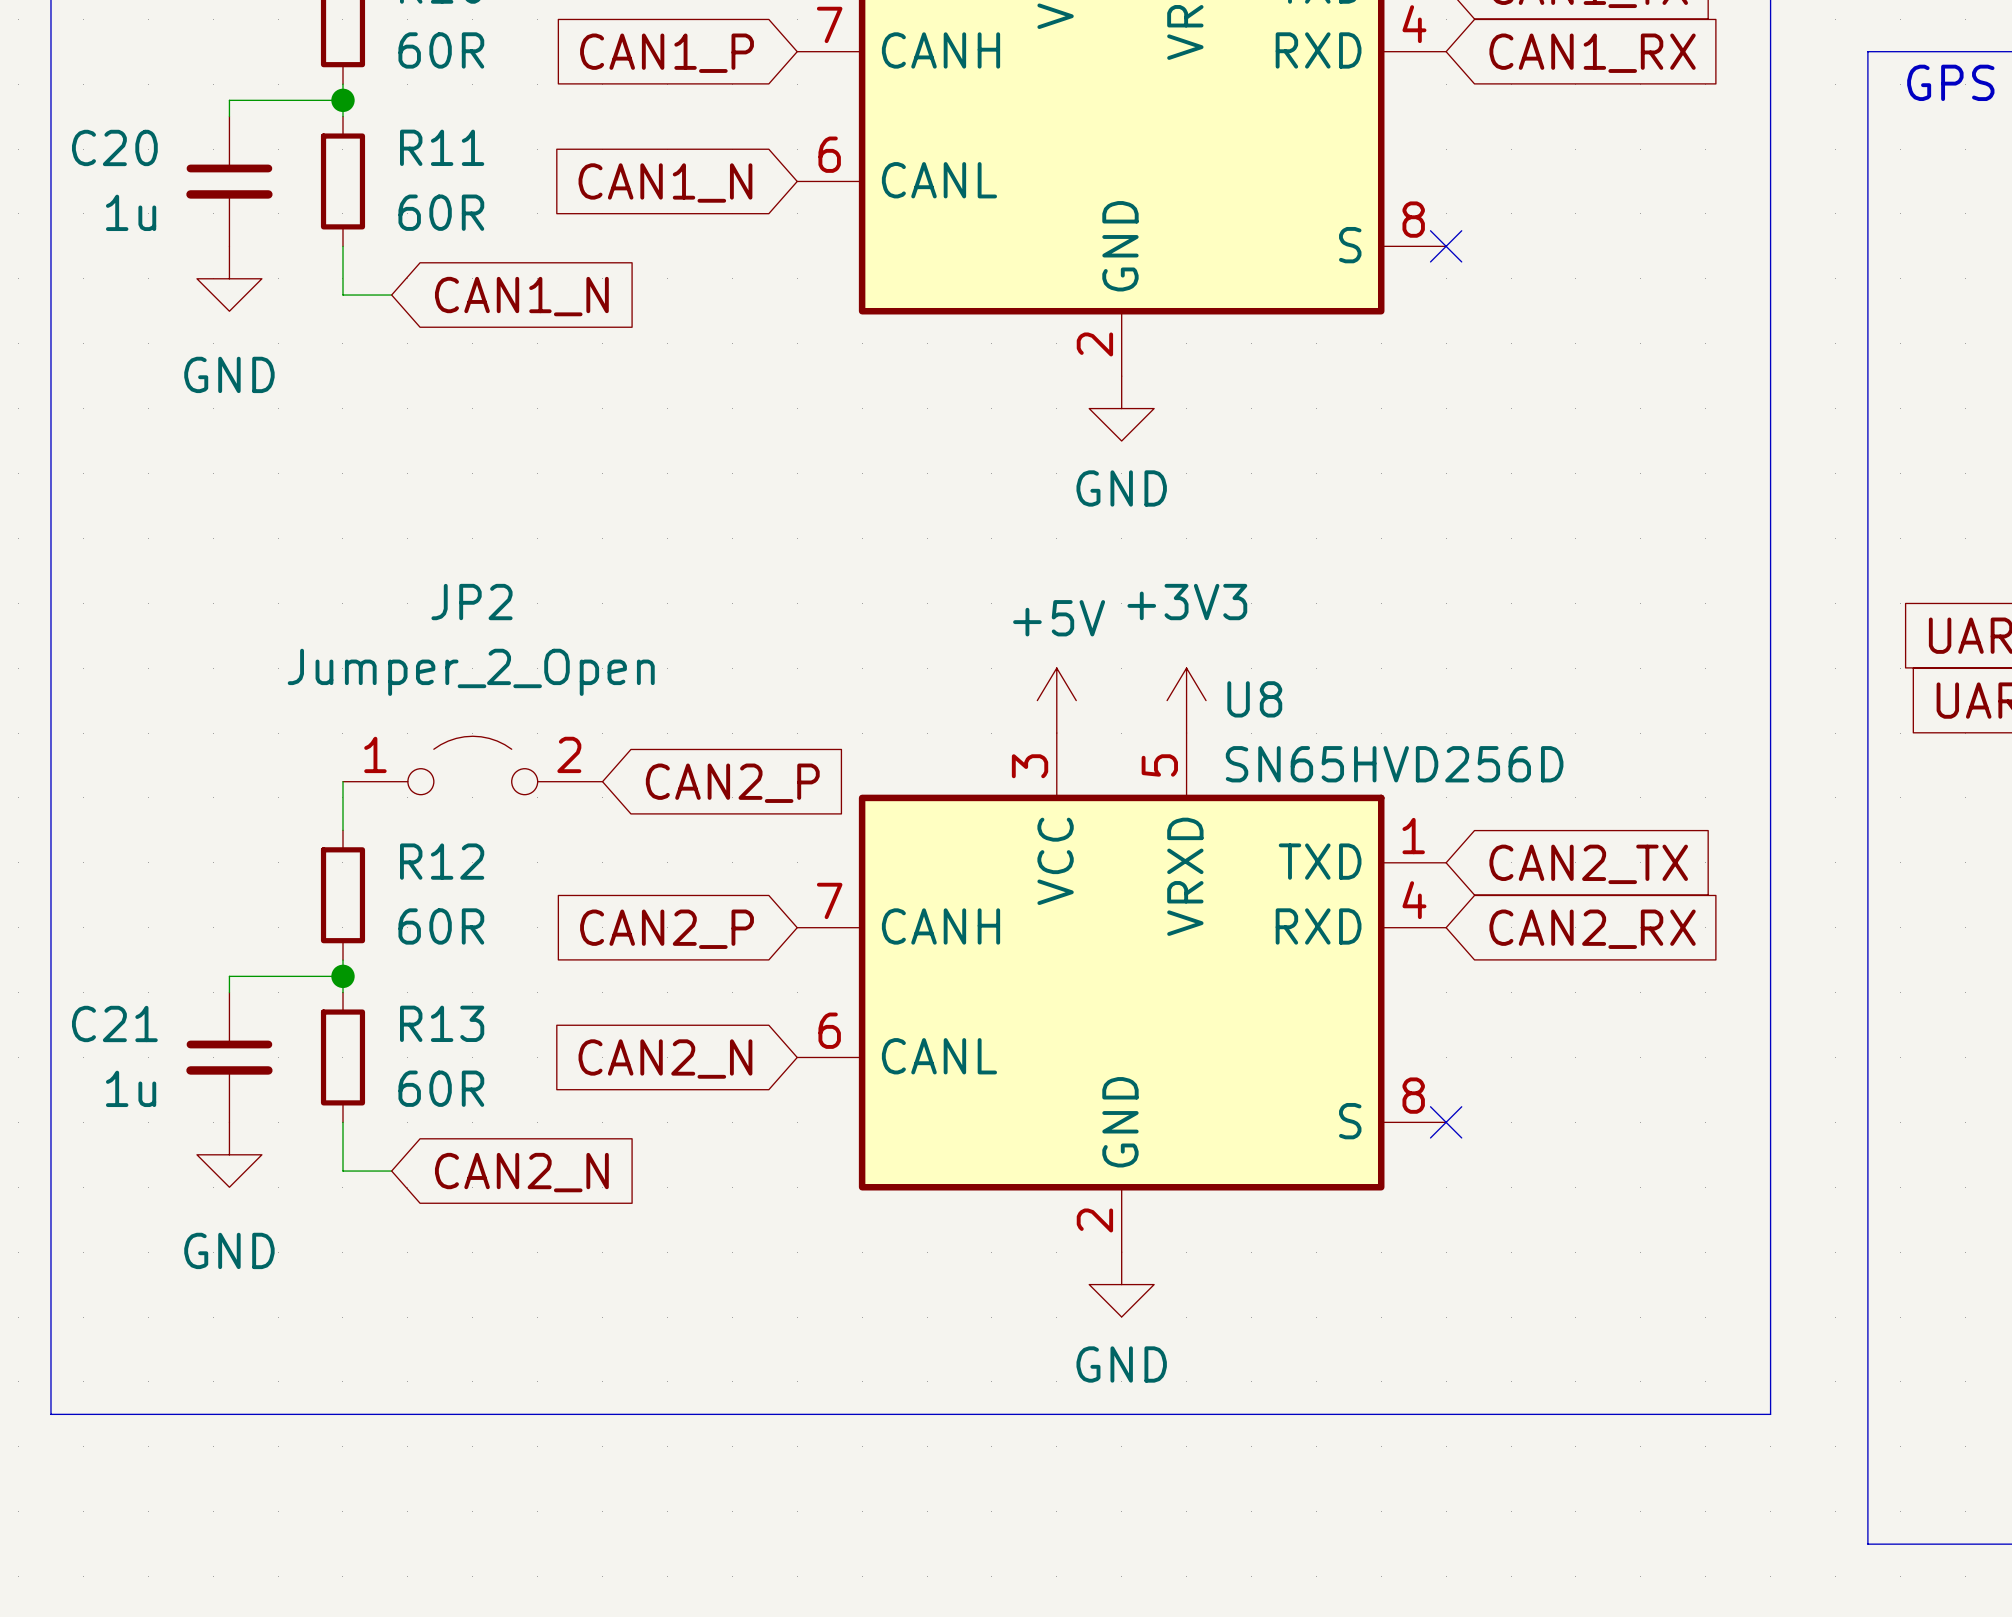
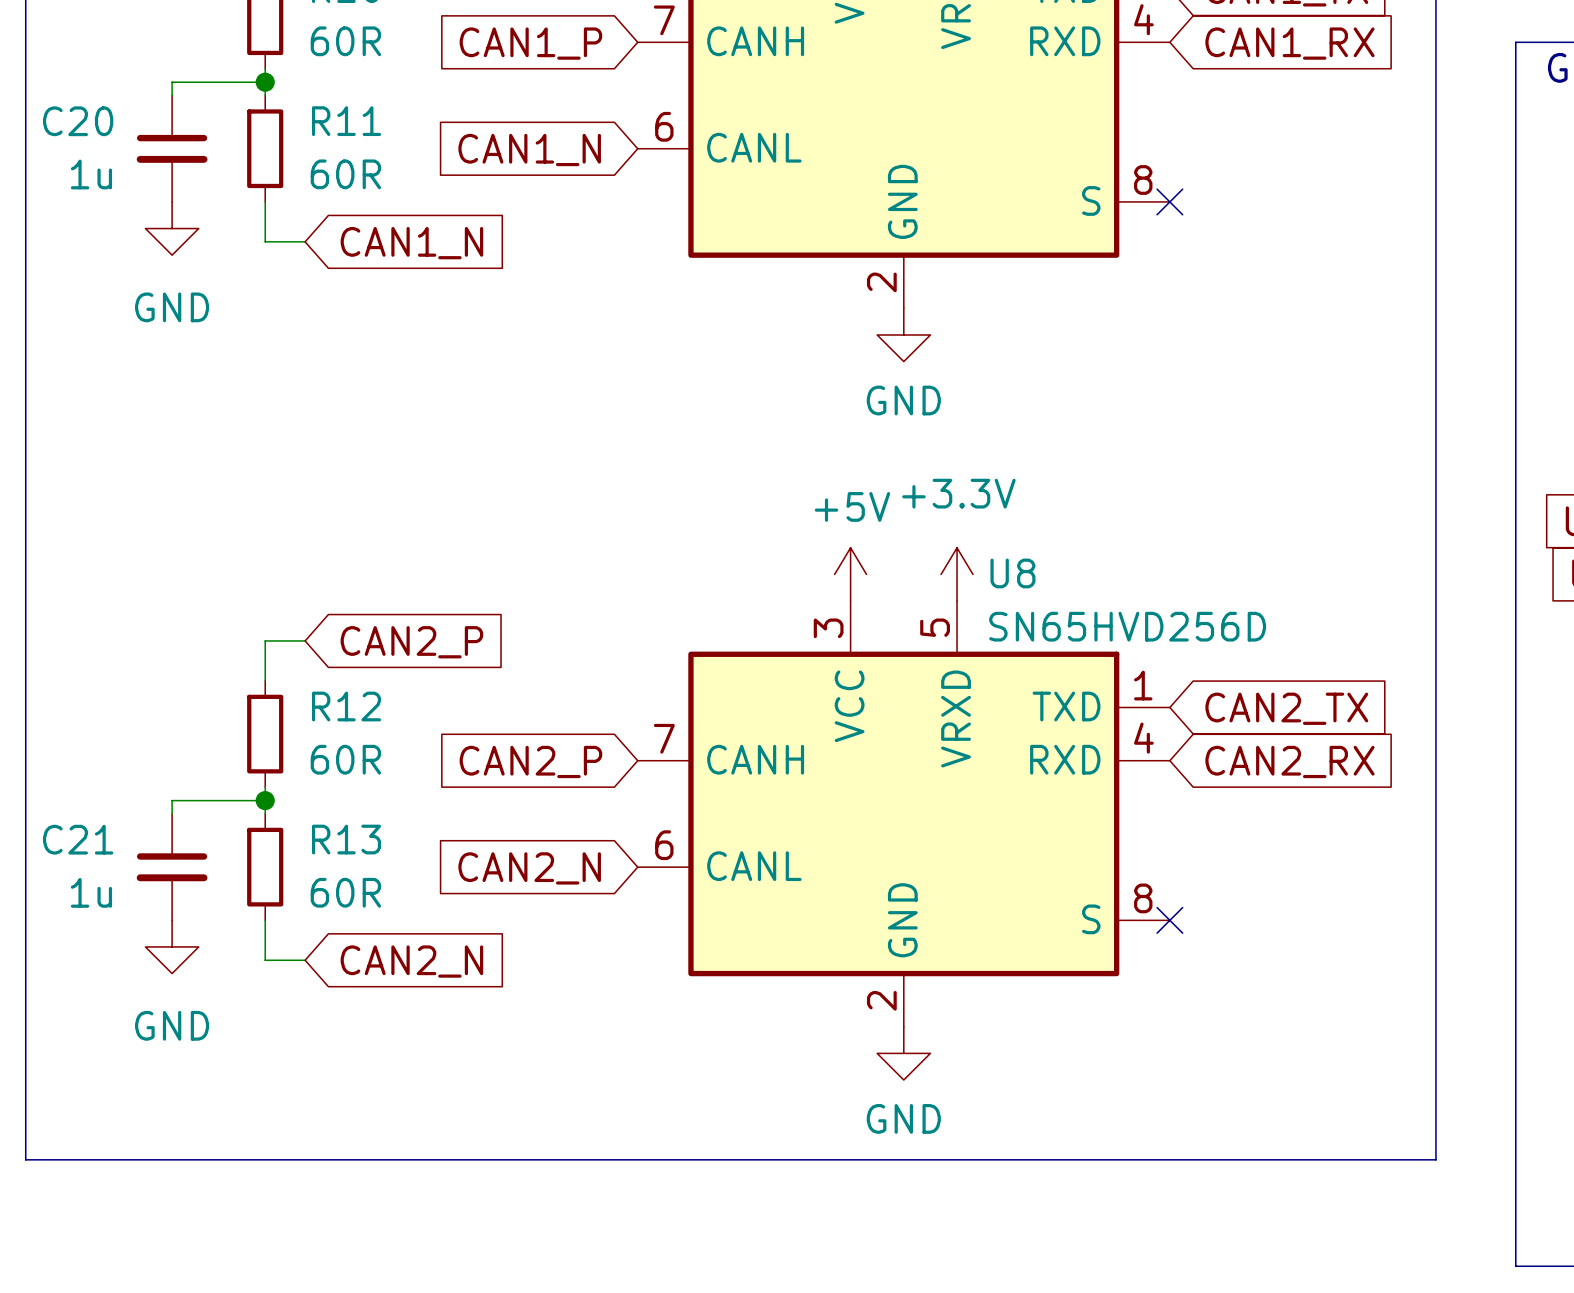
power symbol: +3V3 (1186, 700) -> +3.3V (957, 574)
JP2: Jumper_2_Open (472, 765) -> none
global label position: CAN2_P (732, 783) -> CAN2_P (411, 642)

